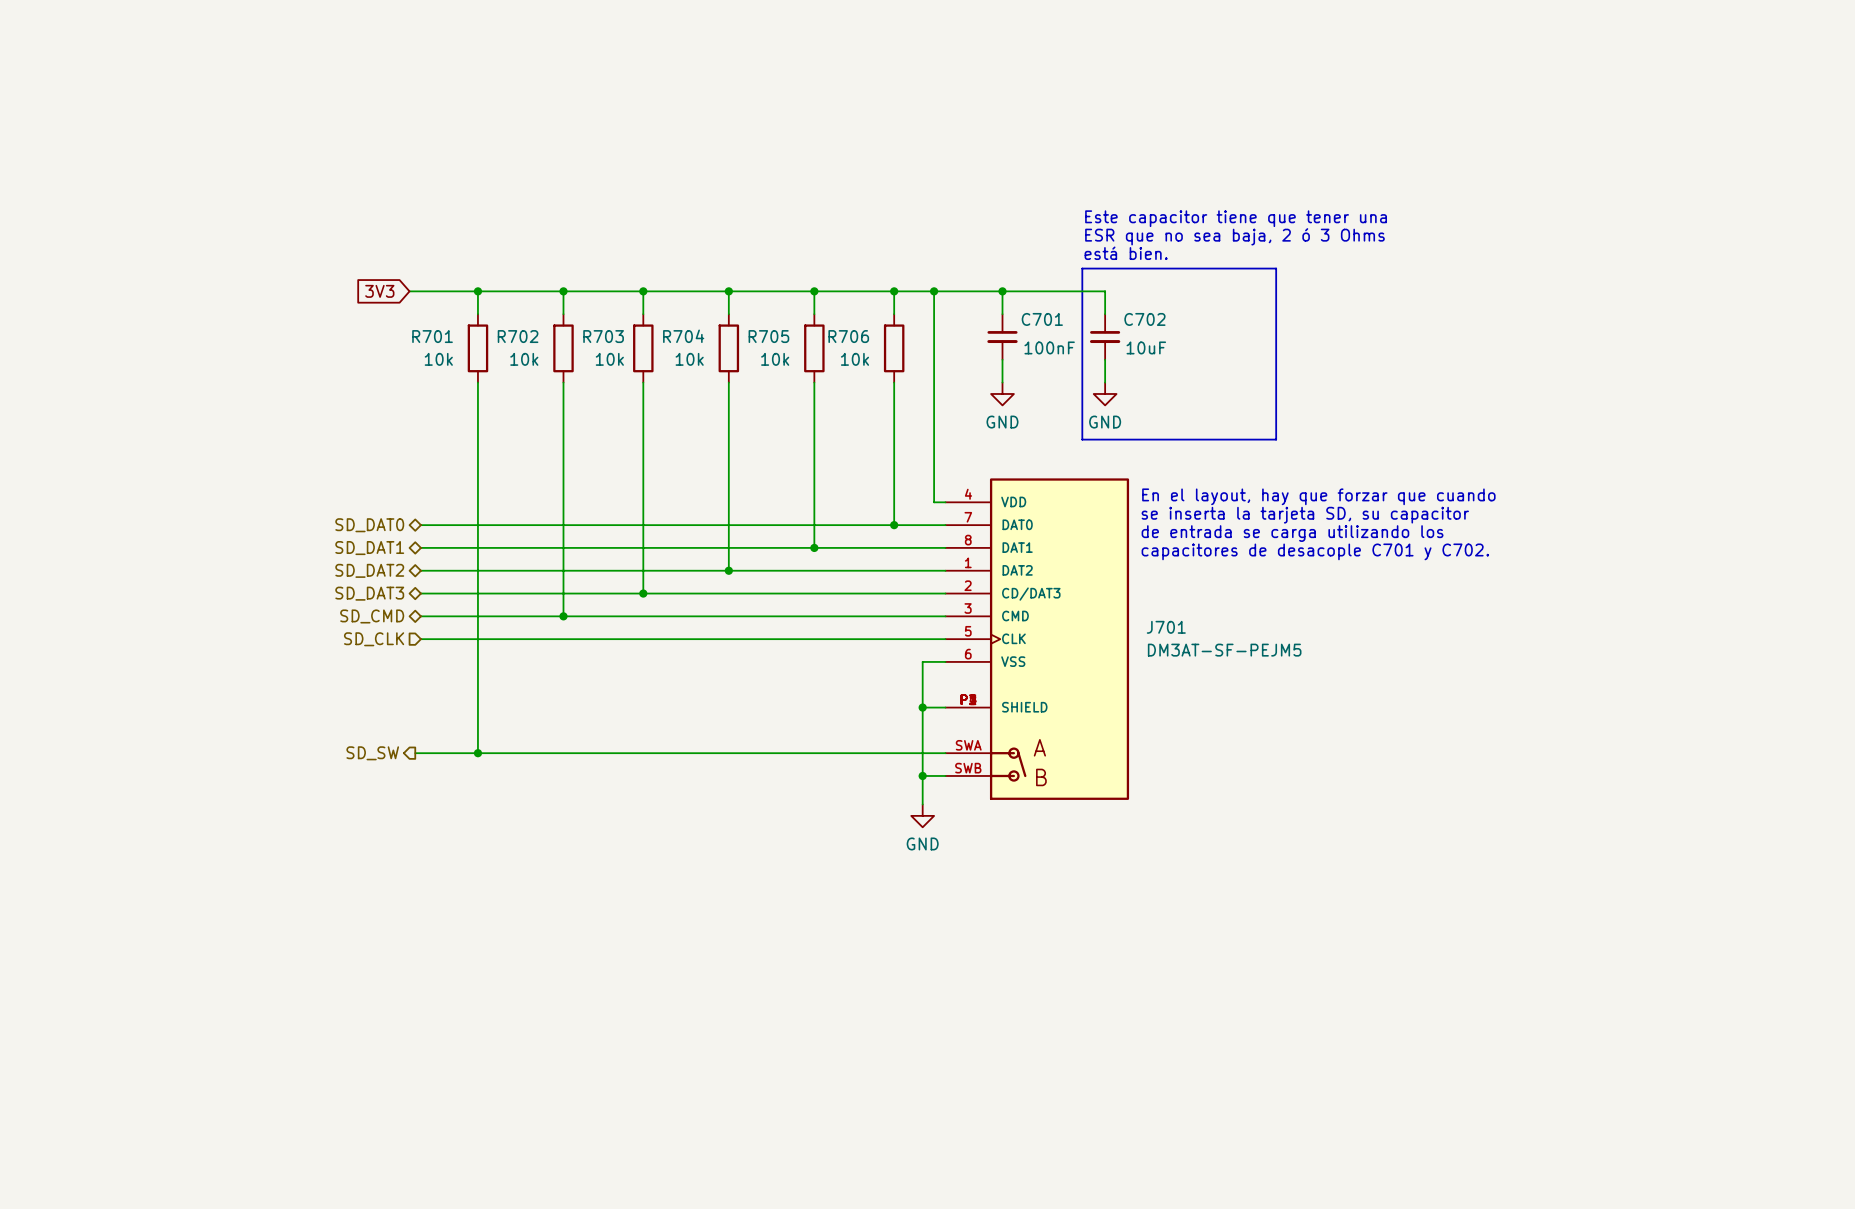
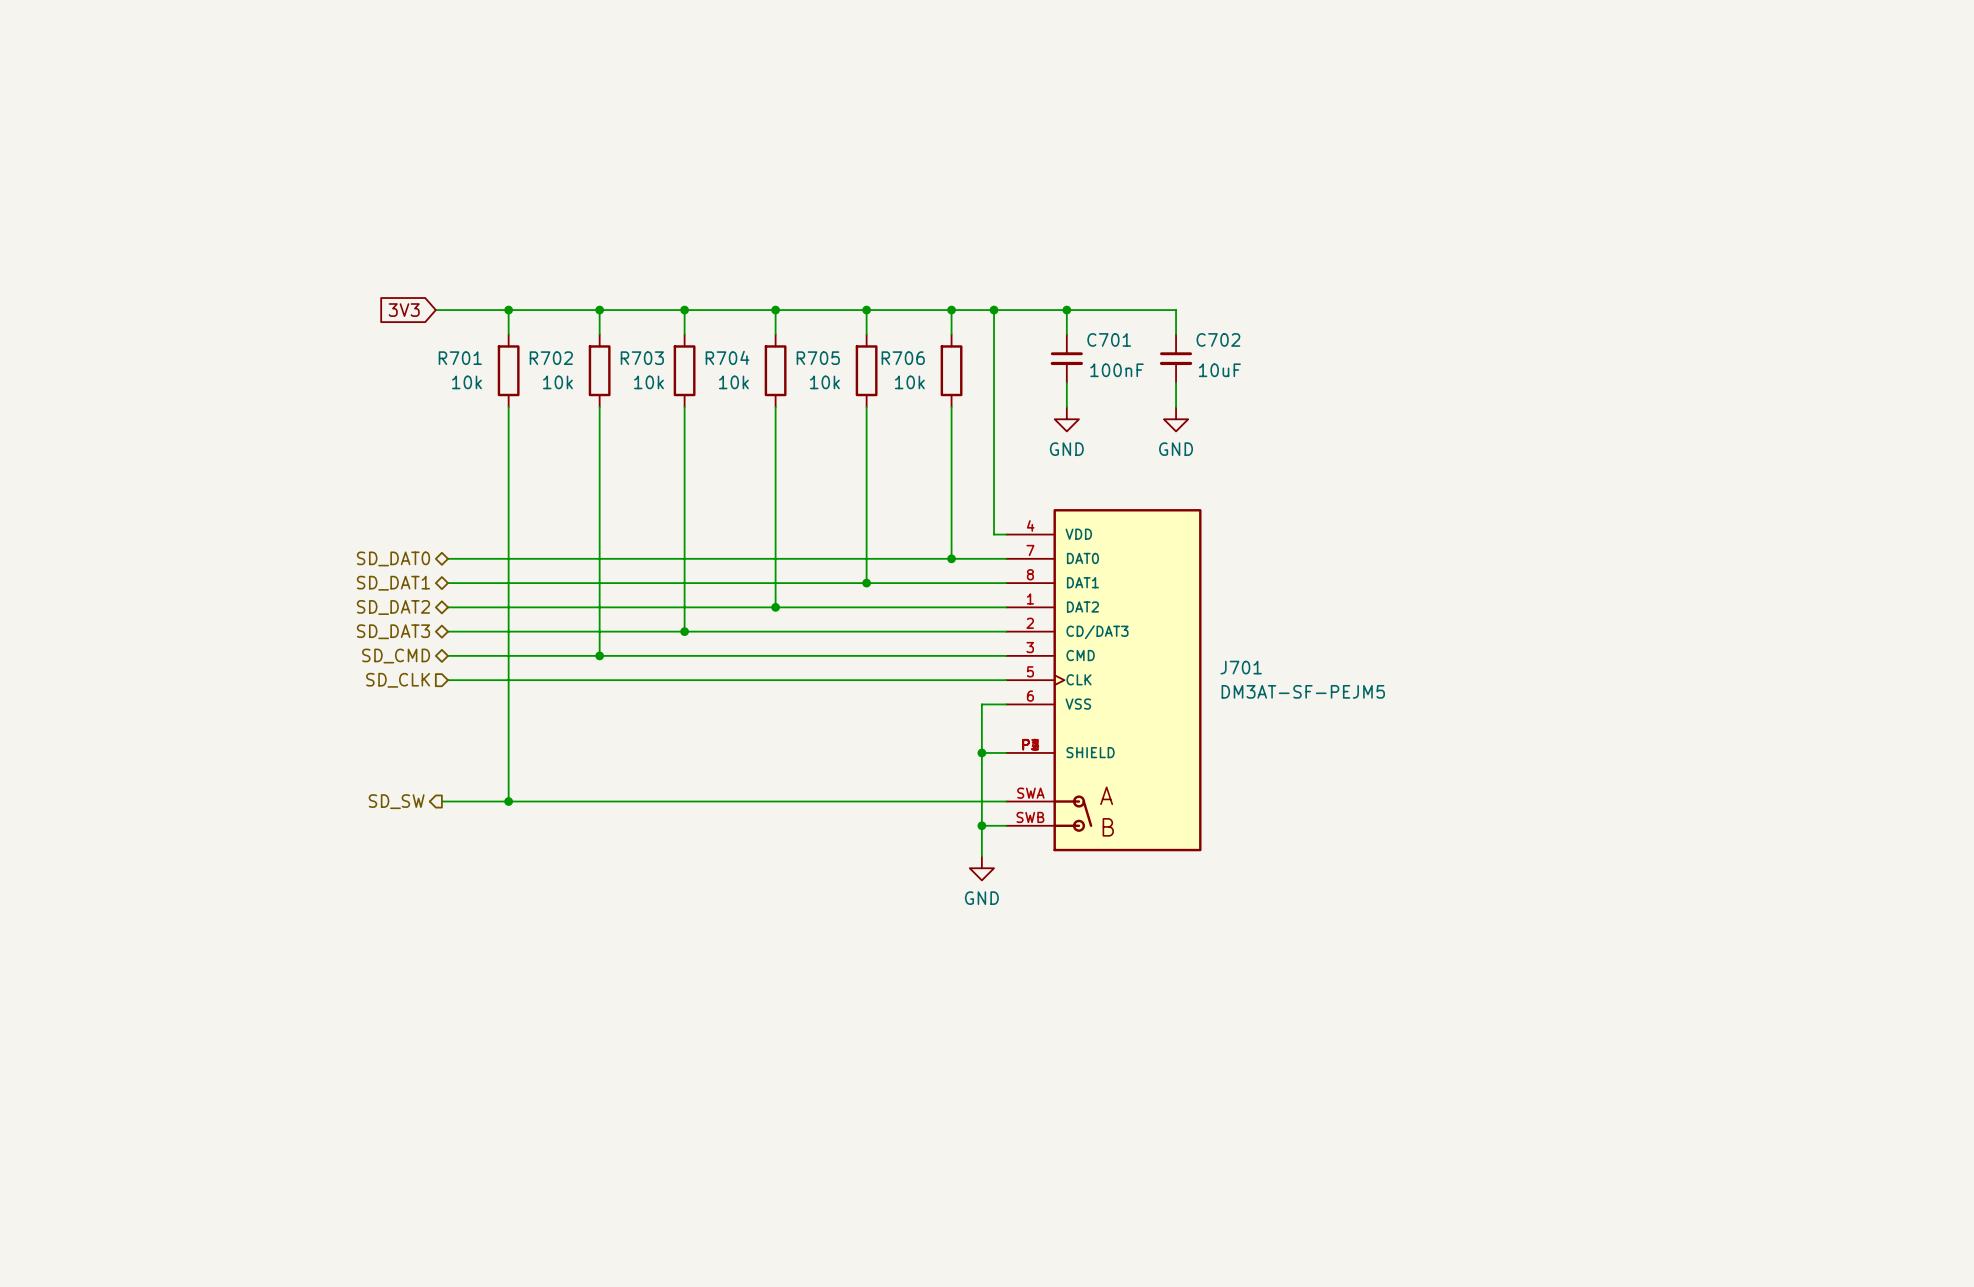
text: Este capacitor tiene que tener una (1236, 218) -> none
text: ESR que no sea baja, 2 ó 3 Ohms (1234, 236) -> none
text: está bien. (1126, 253) -> none
line: (1082, 268) (1082, 439) (1276, 439) (1276, 268) (1082, 268) -> none
text: En el layout, hay que forzar que cuando (1318, 496) -> none
text: se inserta la tarjeta SD, su capacitor (1305, 515) -> none
text: de entrada se carga utilizando los (1292, 533) -> none
text: capacitores de desacople C701 y C702. (1315, 551) -> none

